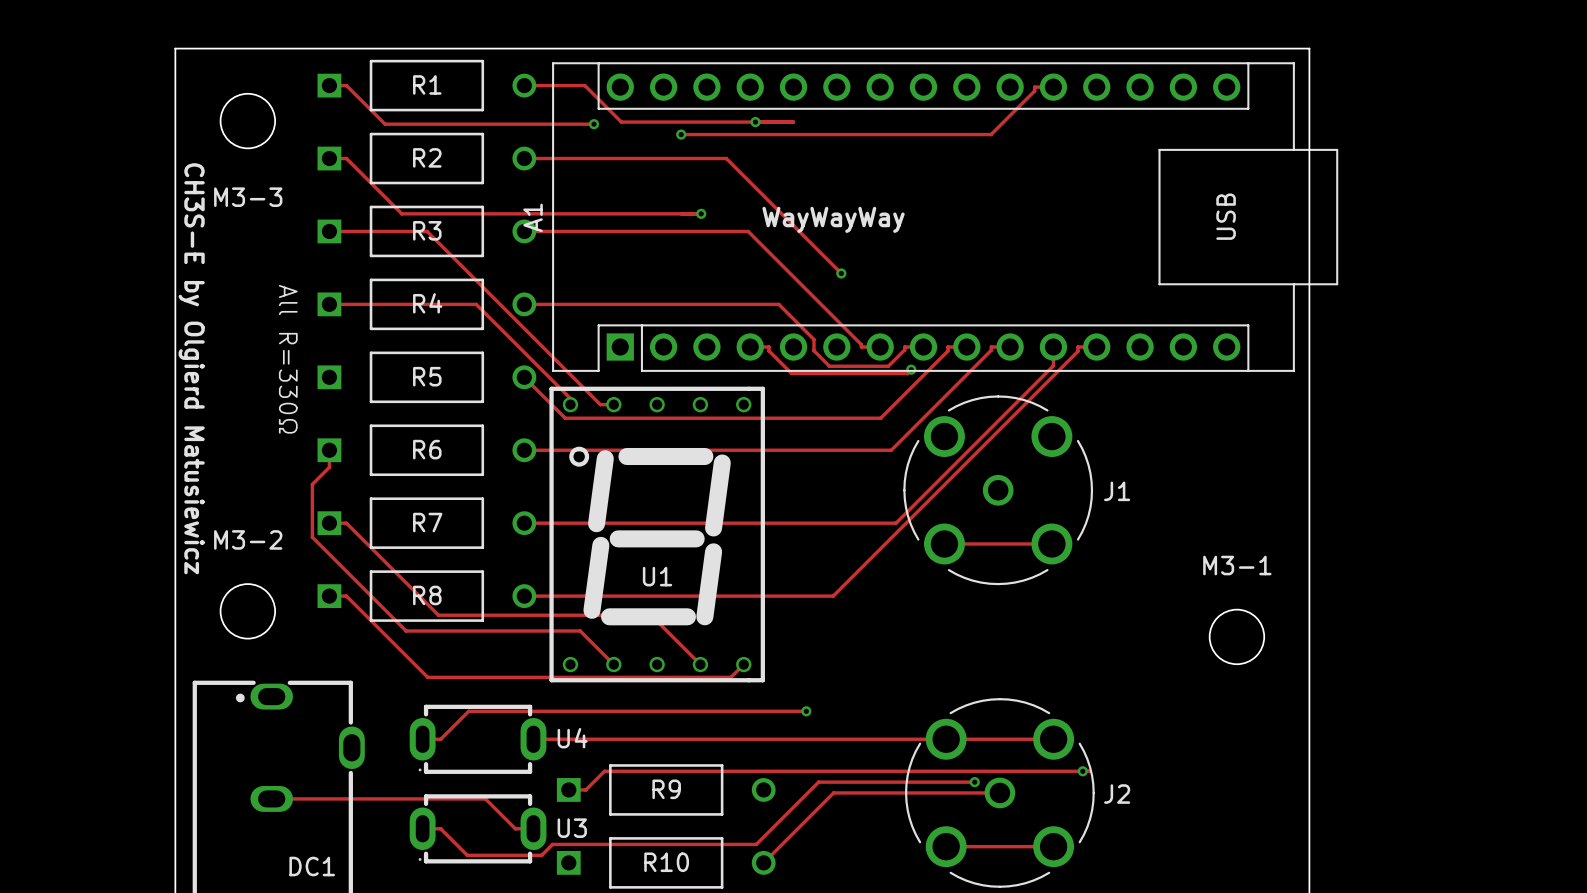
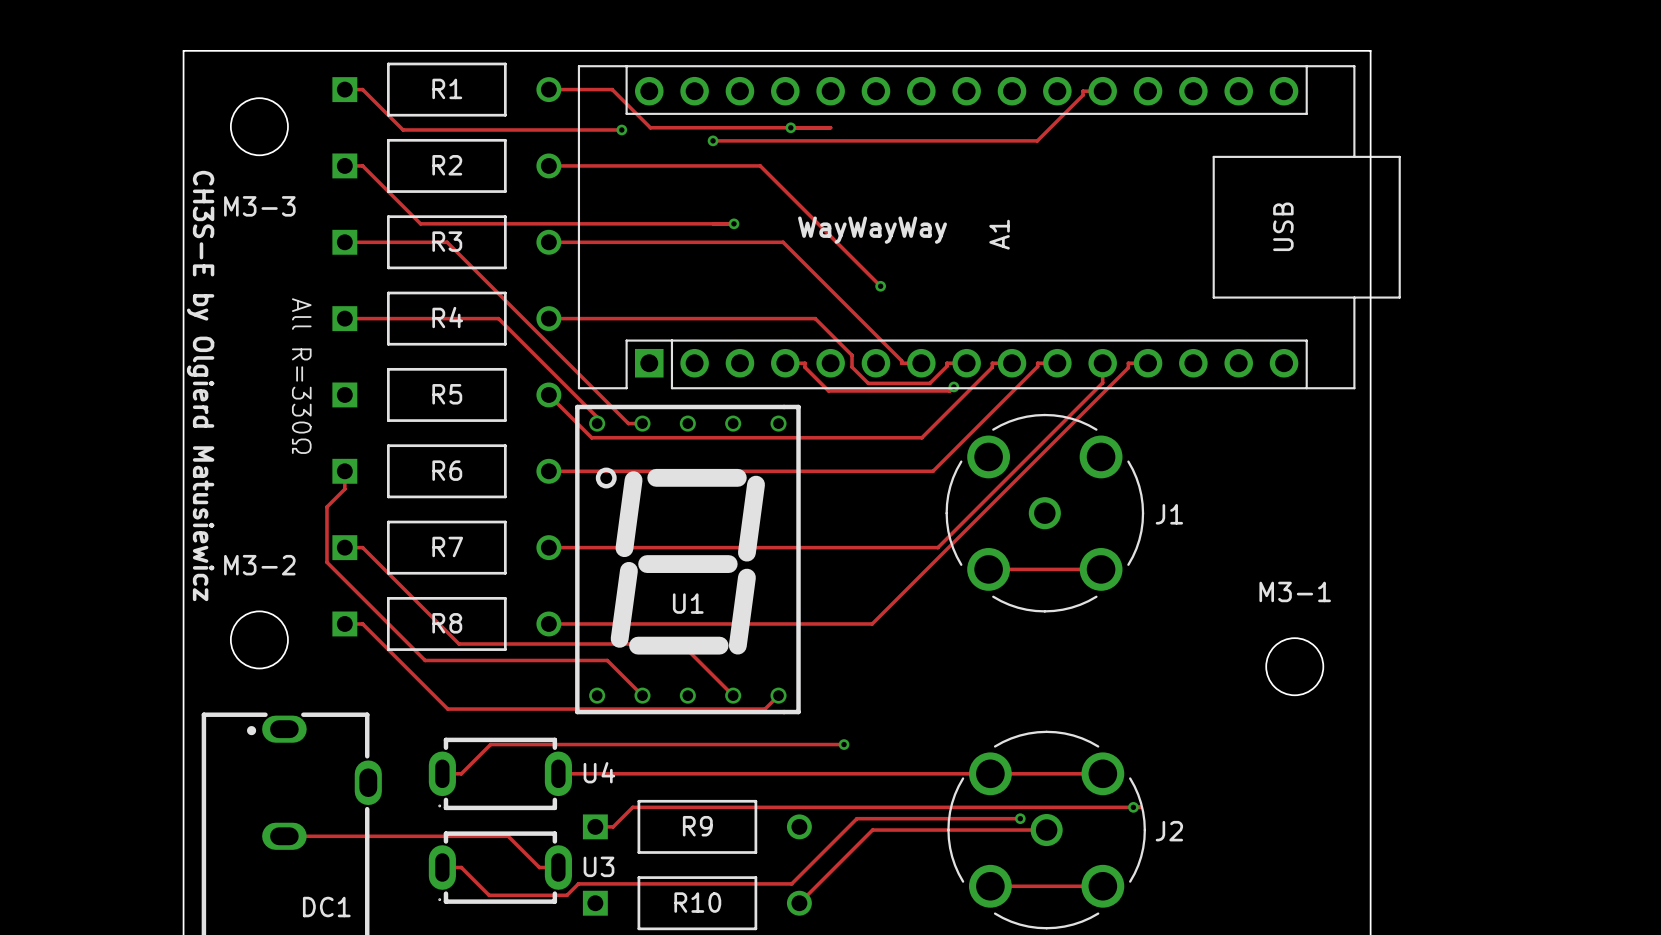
A1 name position: A1 (533, 217) -> A1 (999, 234)

